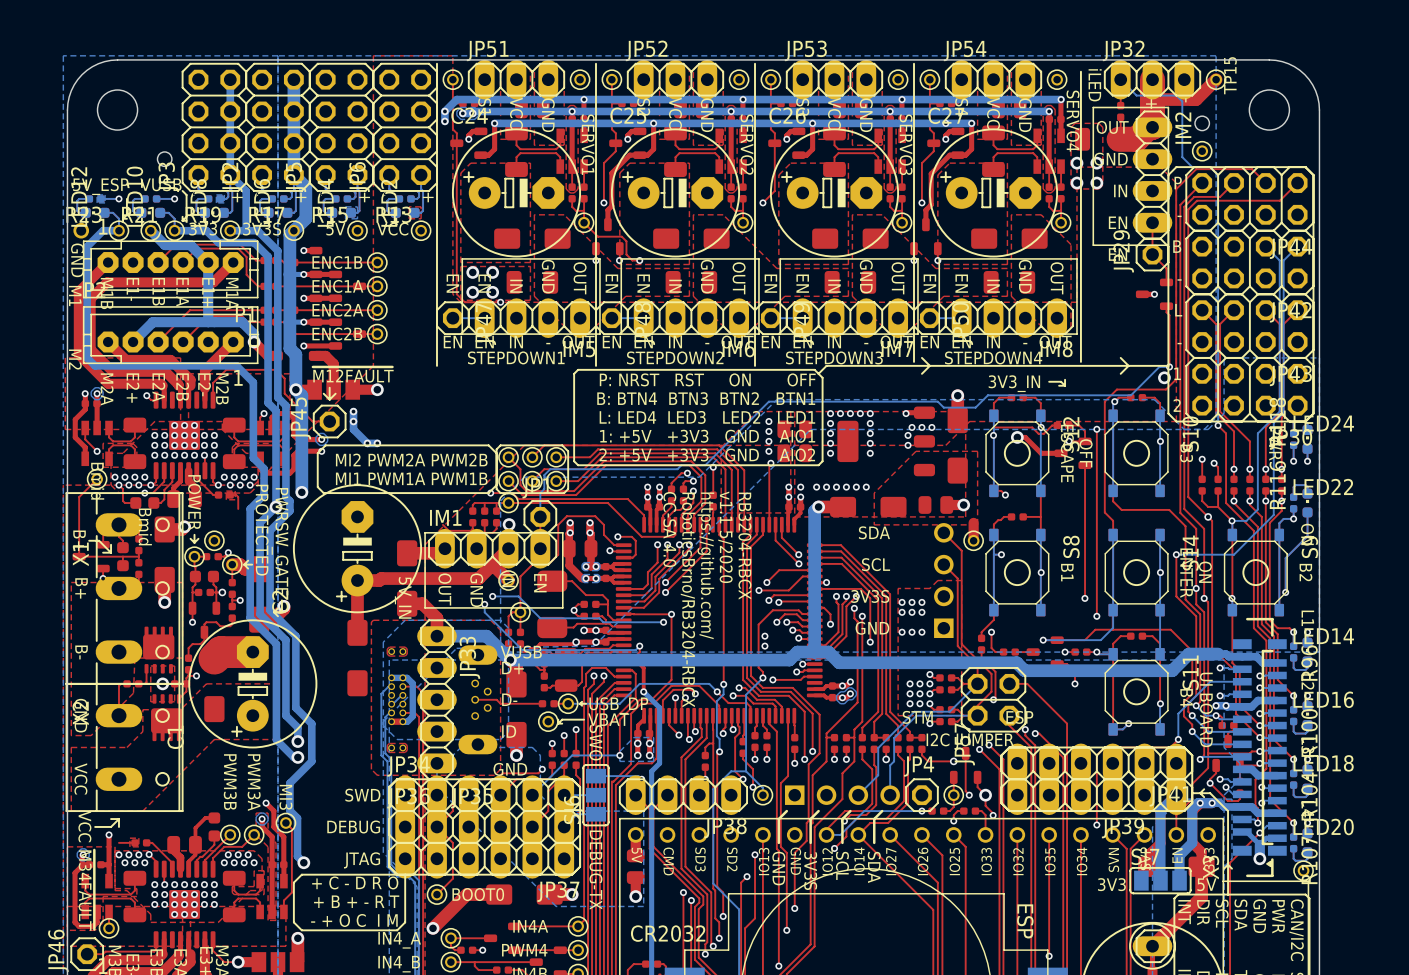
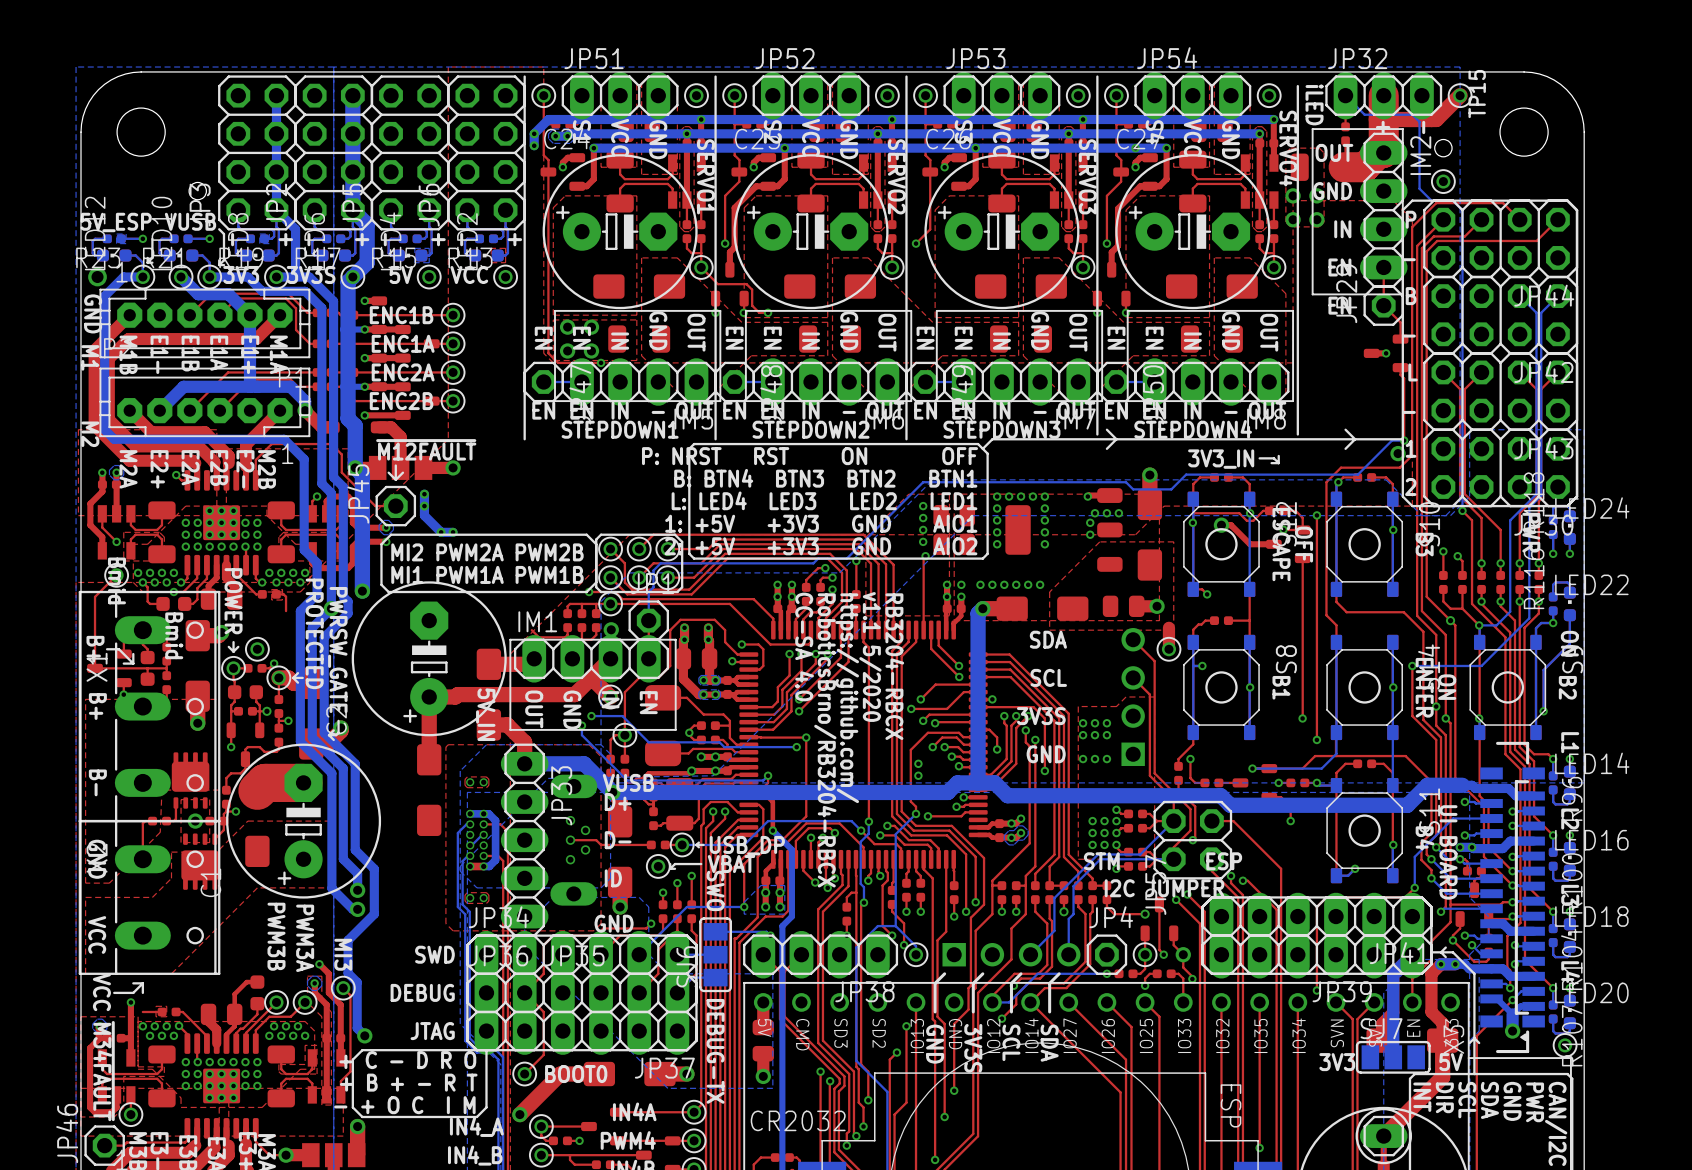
bottom track: (1200, 803) (1192, 809) (1192, 842) (1179, 855) (1179, 880) -> none

